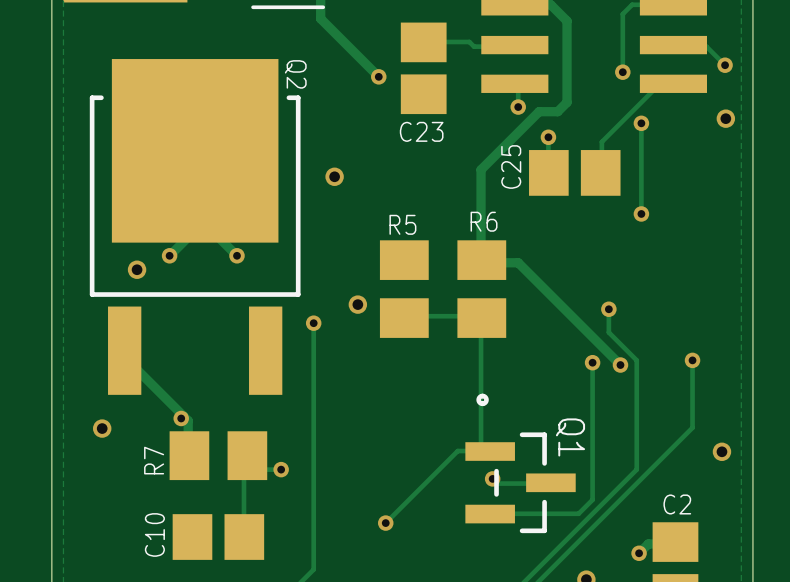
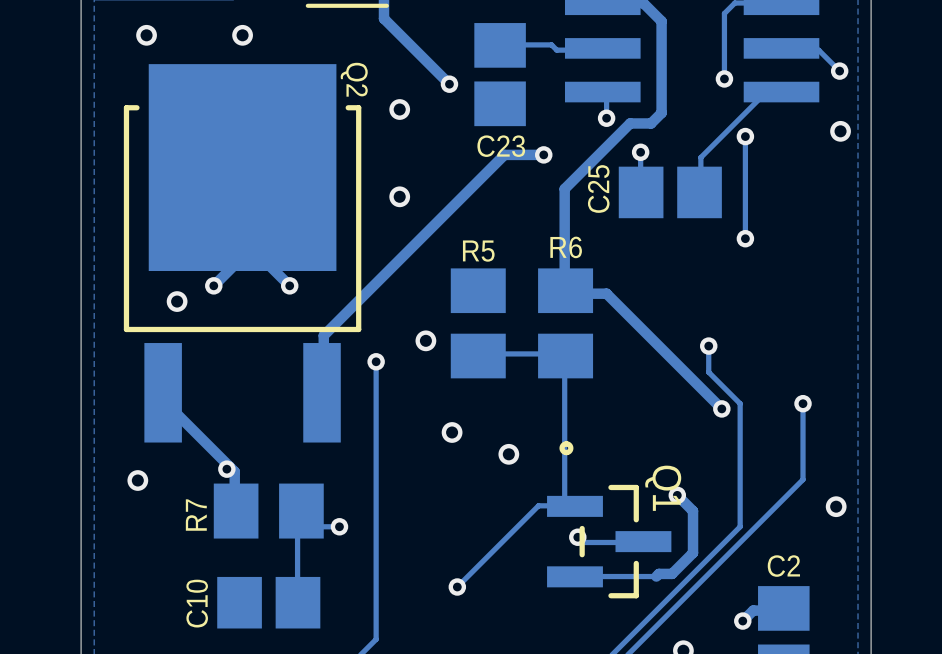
via: none -> (146, 35)
via: none -> (242, 35)
via: none -> (399, 109)
track: none -> (543, 154) (504, 154) (323, 335) (323, 390) (322, 392)
via: none -> (543, 154)
track: (592, 362) (592, 499) (578, 513) (562, 513) -> (677, 495) (693, 511) (693, 552) (672, 573) (658, 573) (656, 576)
via position: (592, 362) -> (677, 495)
via: none -> (452, 432)
via: none -> (508, 454)

